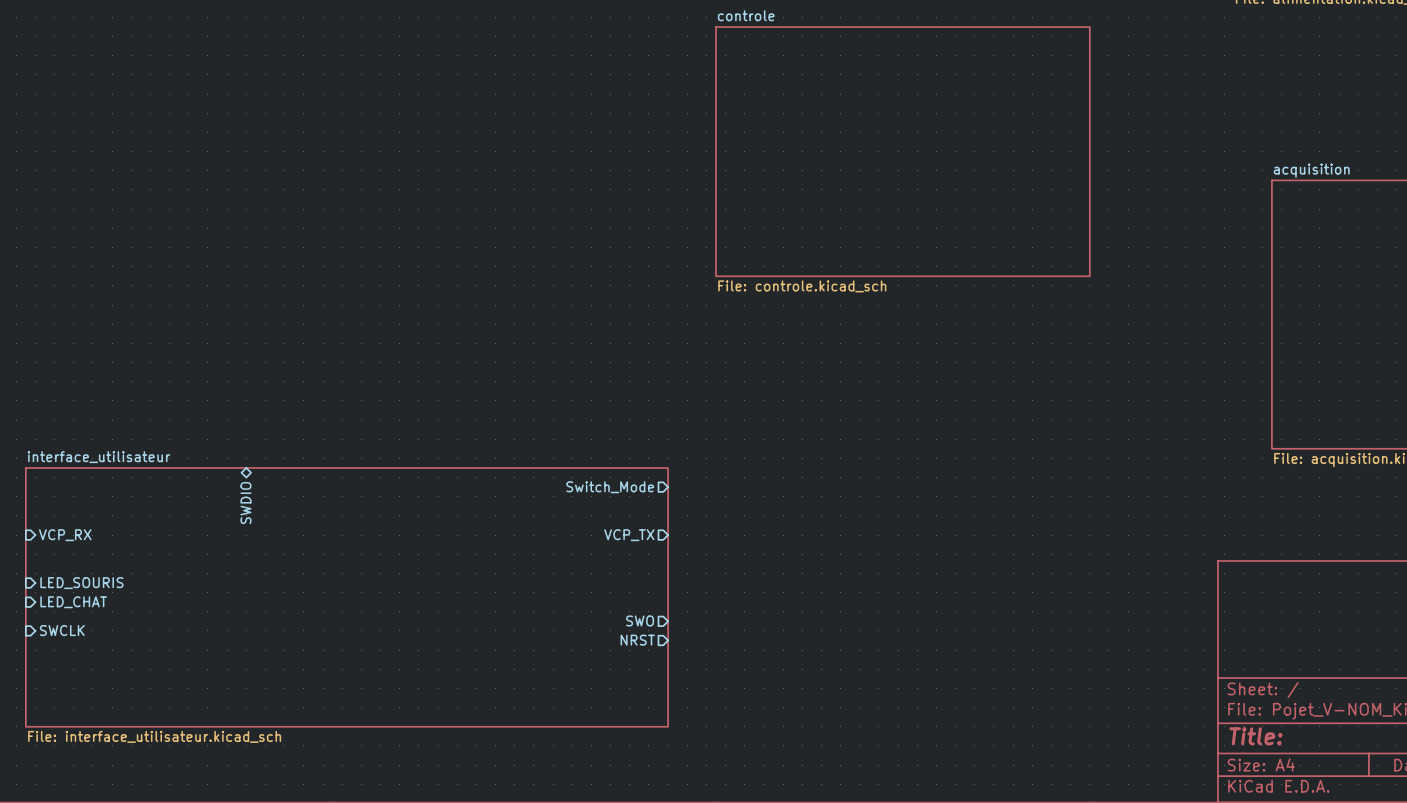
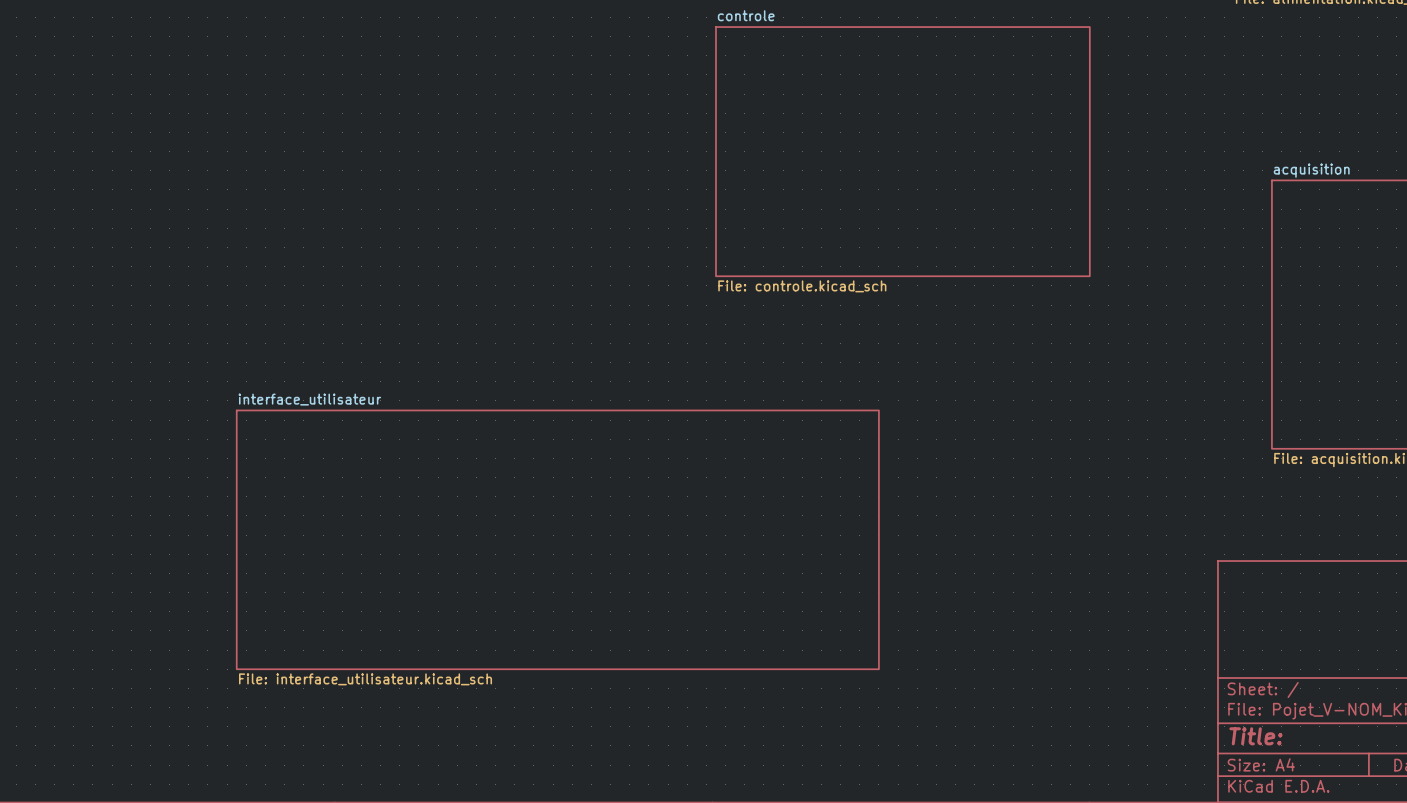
sheet pin: Switch_Mode (610, 487) -> none
sheet pin: SWDIO (245, 503) -> none
sheet pin: VCP_RX (65, 535) -> none
sheet pin: VCP_TX (629, 535) -> none
sheet interface_utilisateur: none -> File: interface_utilisateur.kicad_sch (557, 539)
sheet pin: LED_SOURIS (81, 583) -> none
sheet interface_utilisateur: File: interface_utilisateur.kicad_sch (346, 597) -> none
sheet pin: LED_CHAT (73, 602) -> none
sheet pin: SWO (640, 620) -> none
sheet pin: SWCLK (62, 630) -> none
sheet pin: NRST (637, 640) -> none

